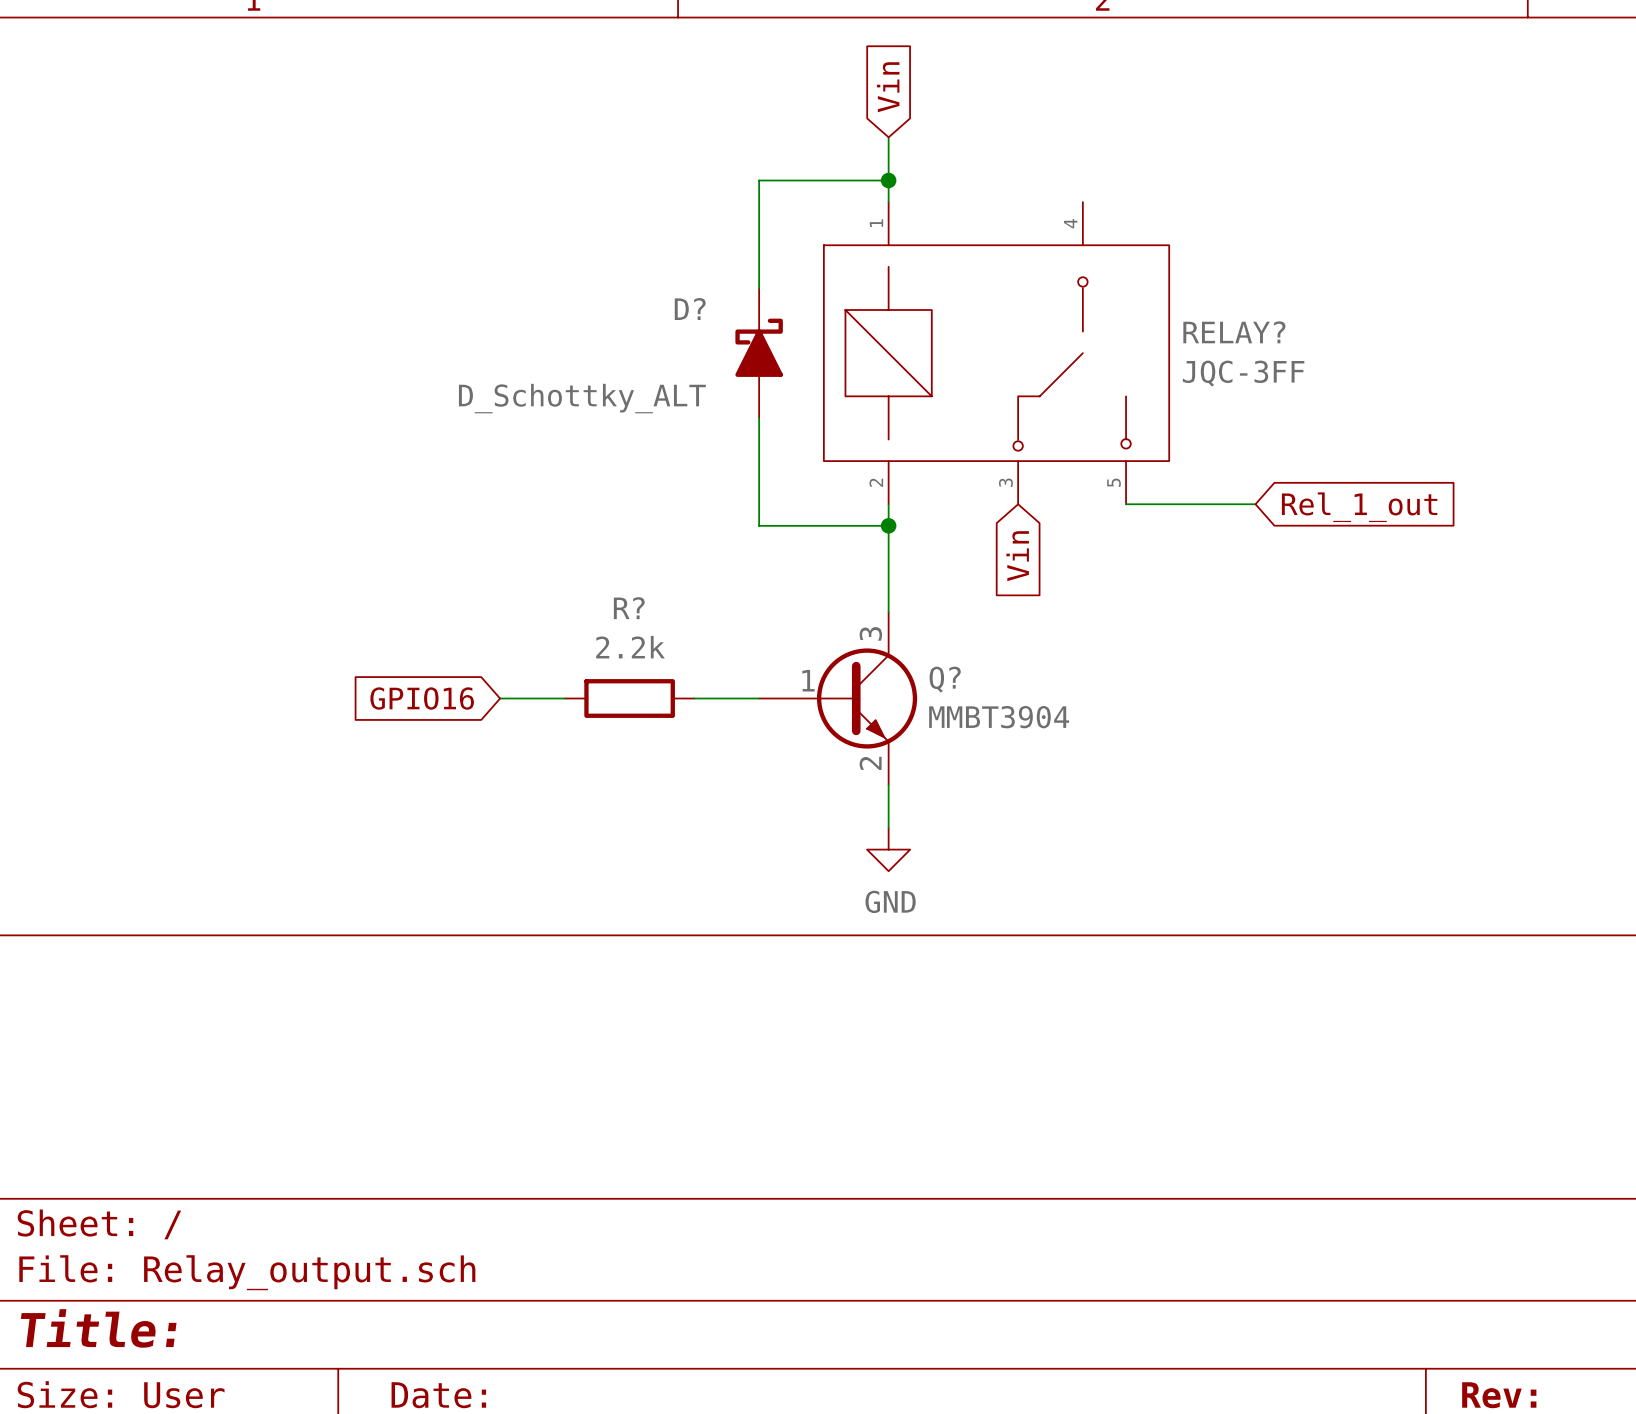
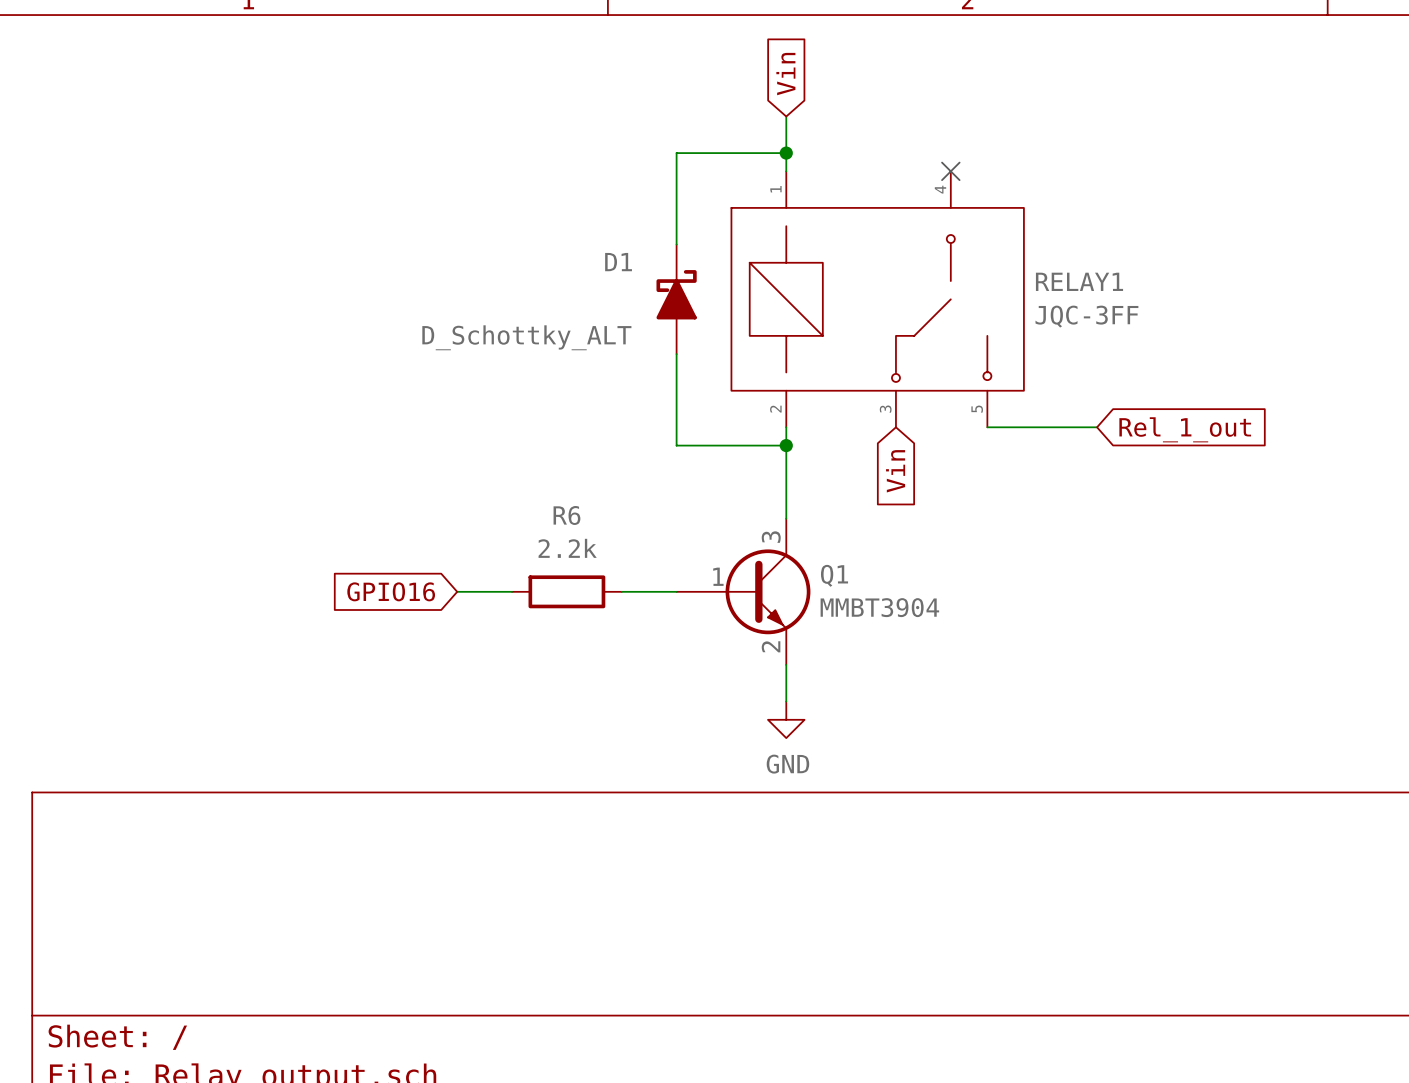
no-connect mark: none -> (950, 171)
D? name: D? (690, 309) -> D1 (618, 262)
RELAY? name: RELAY? (1234, 332) -> RELAY1 (1079, 281)
R? name: R? (629, 608) -> R6 (566, 515)
Q? name: Q? (945, 679) -> Q1 (834, 575)

